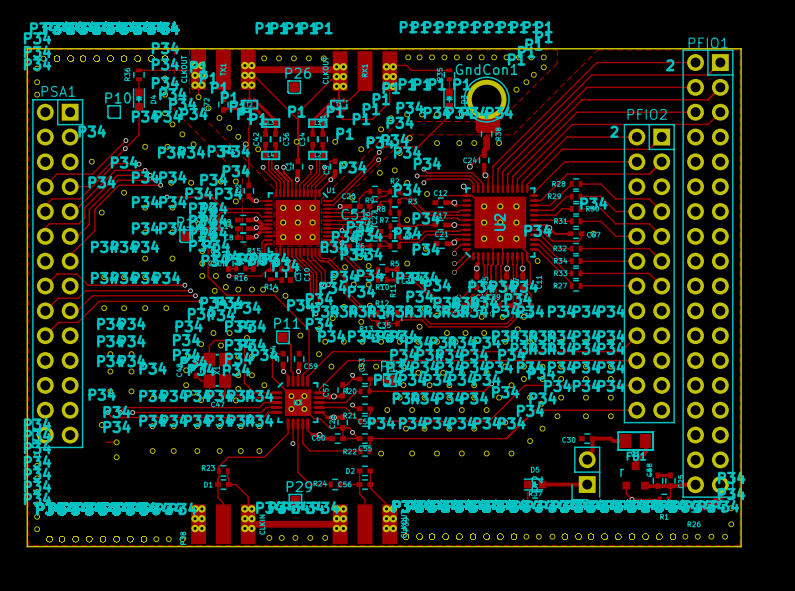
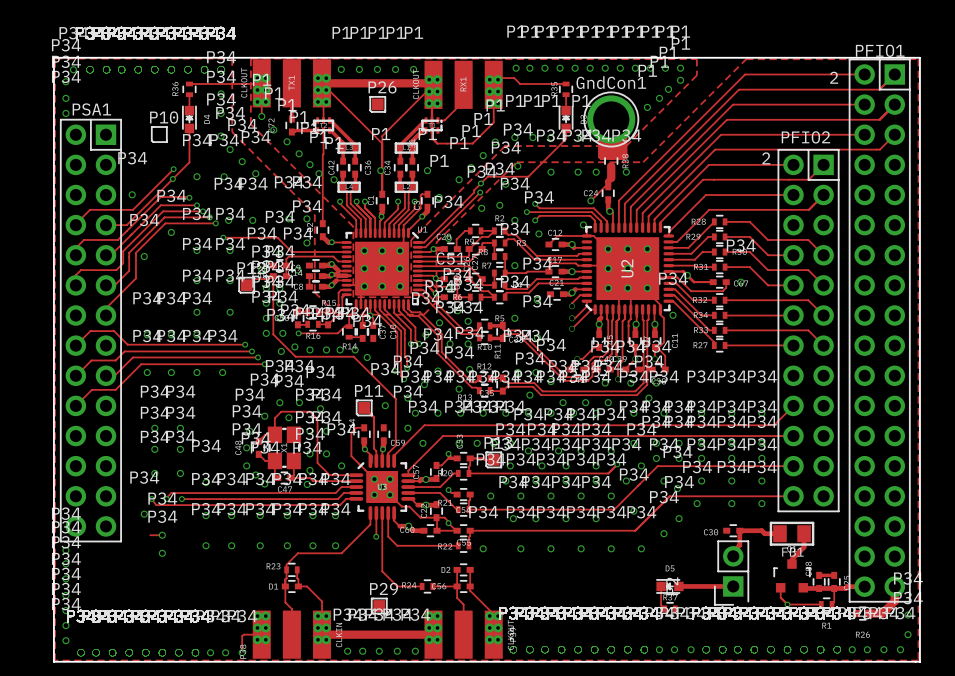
track: none -> (261, 634) (243, 634) (242, 652)

